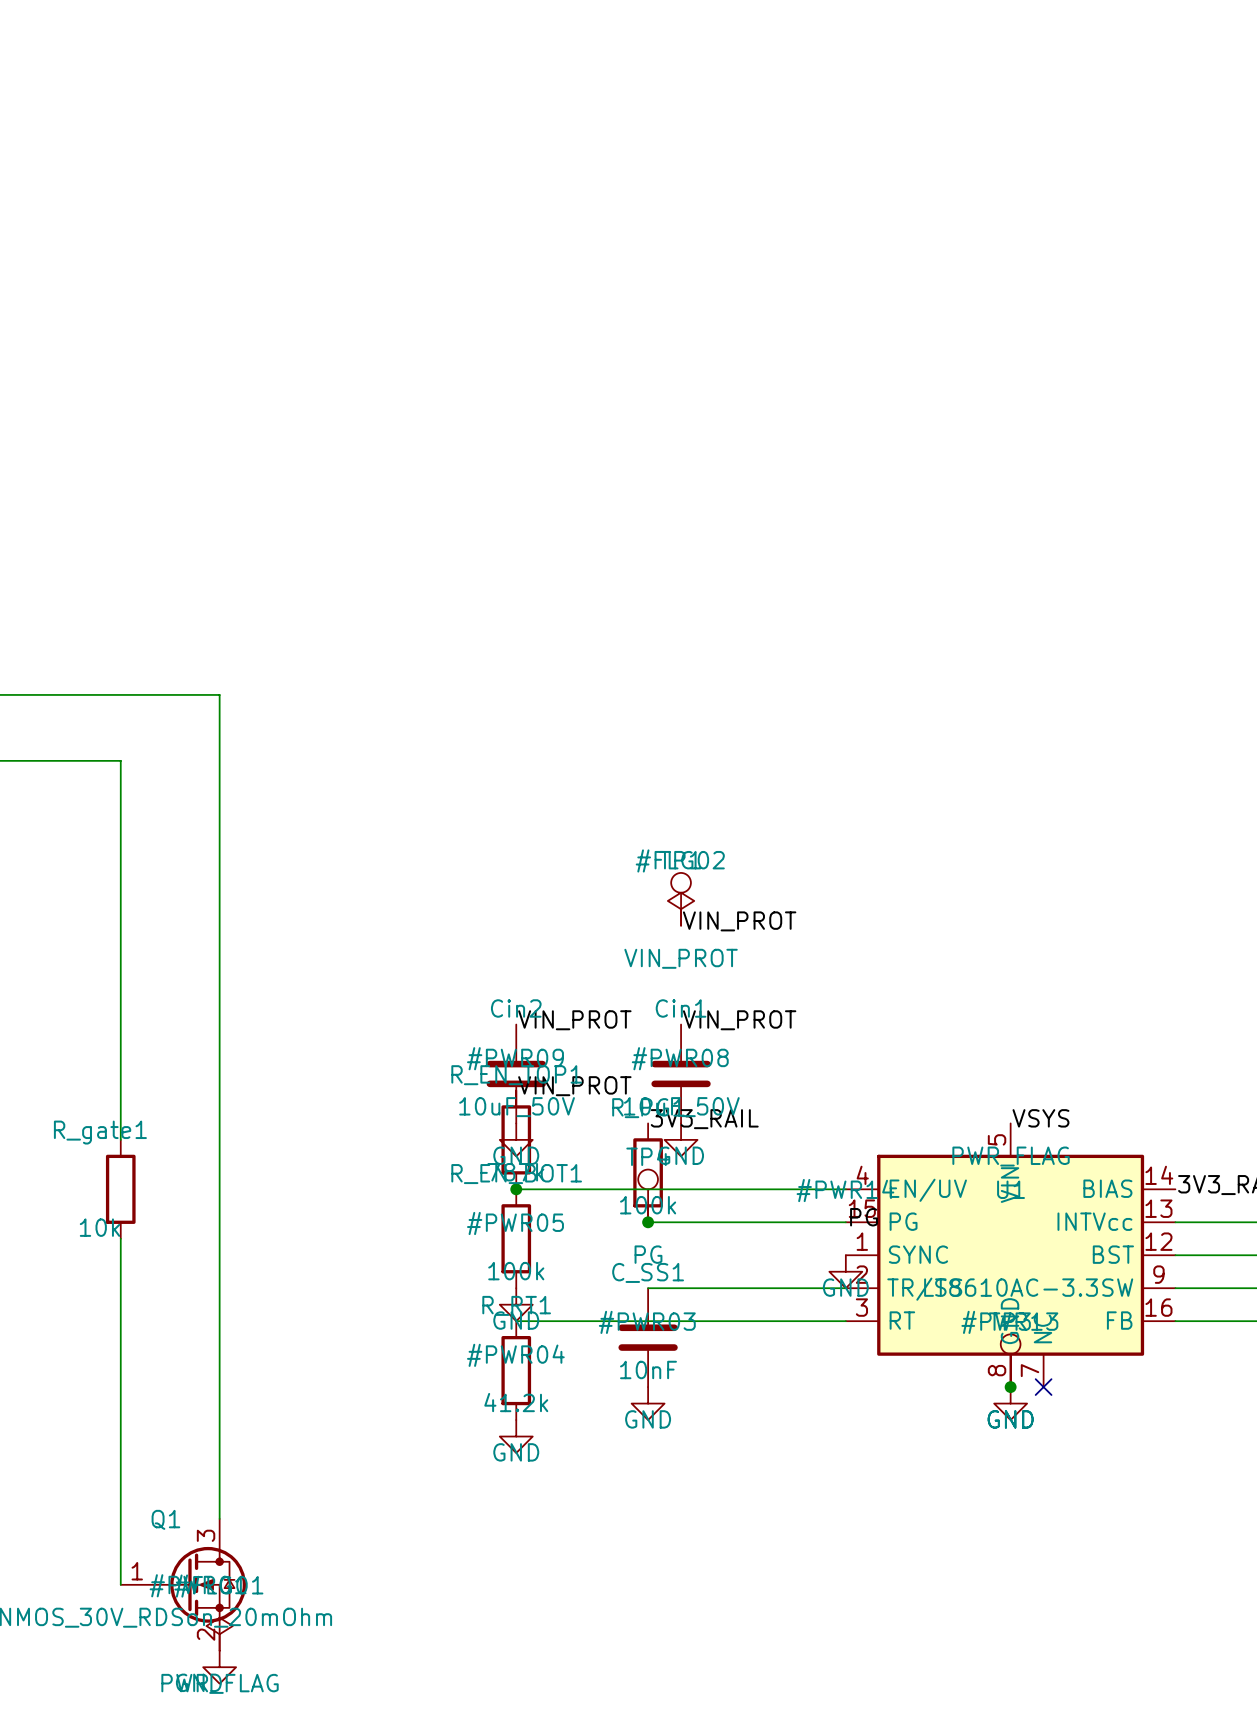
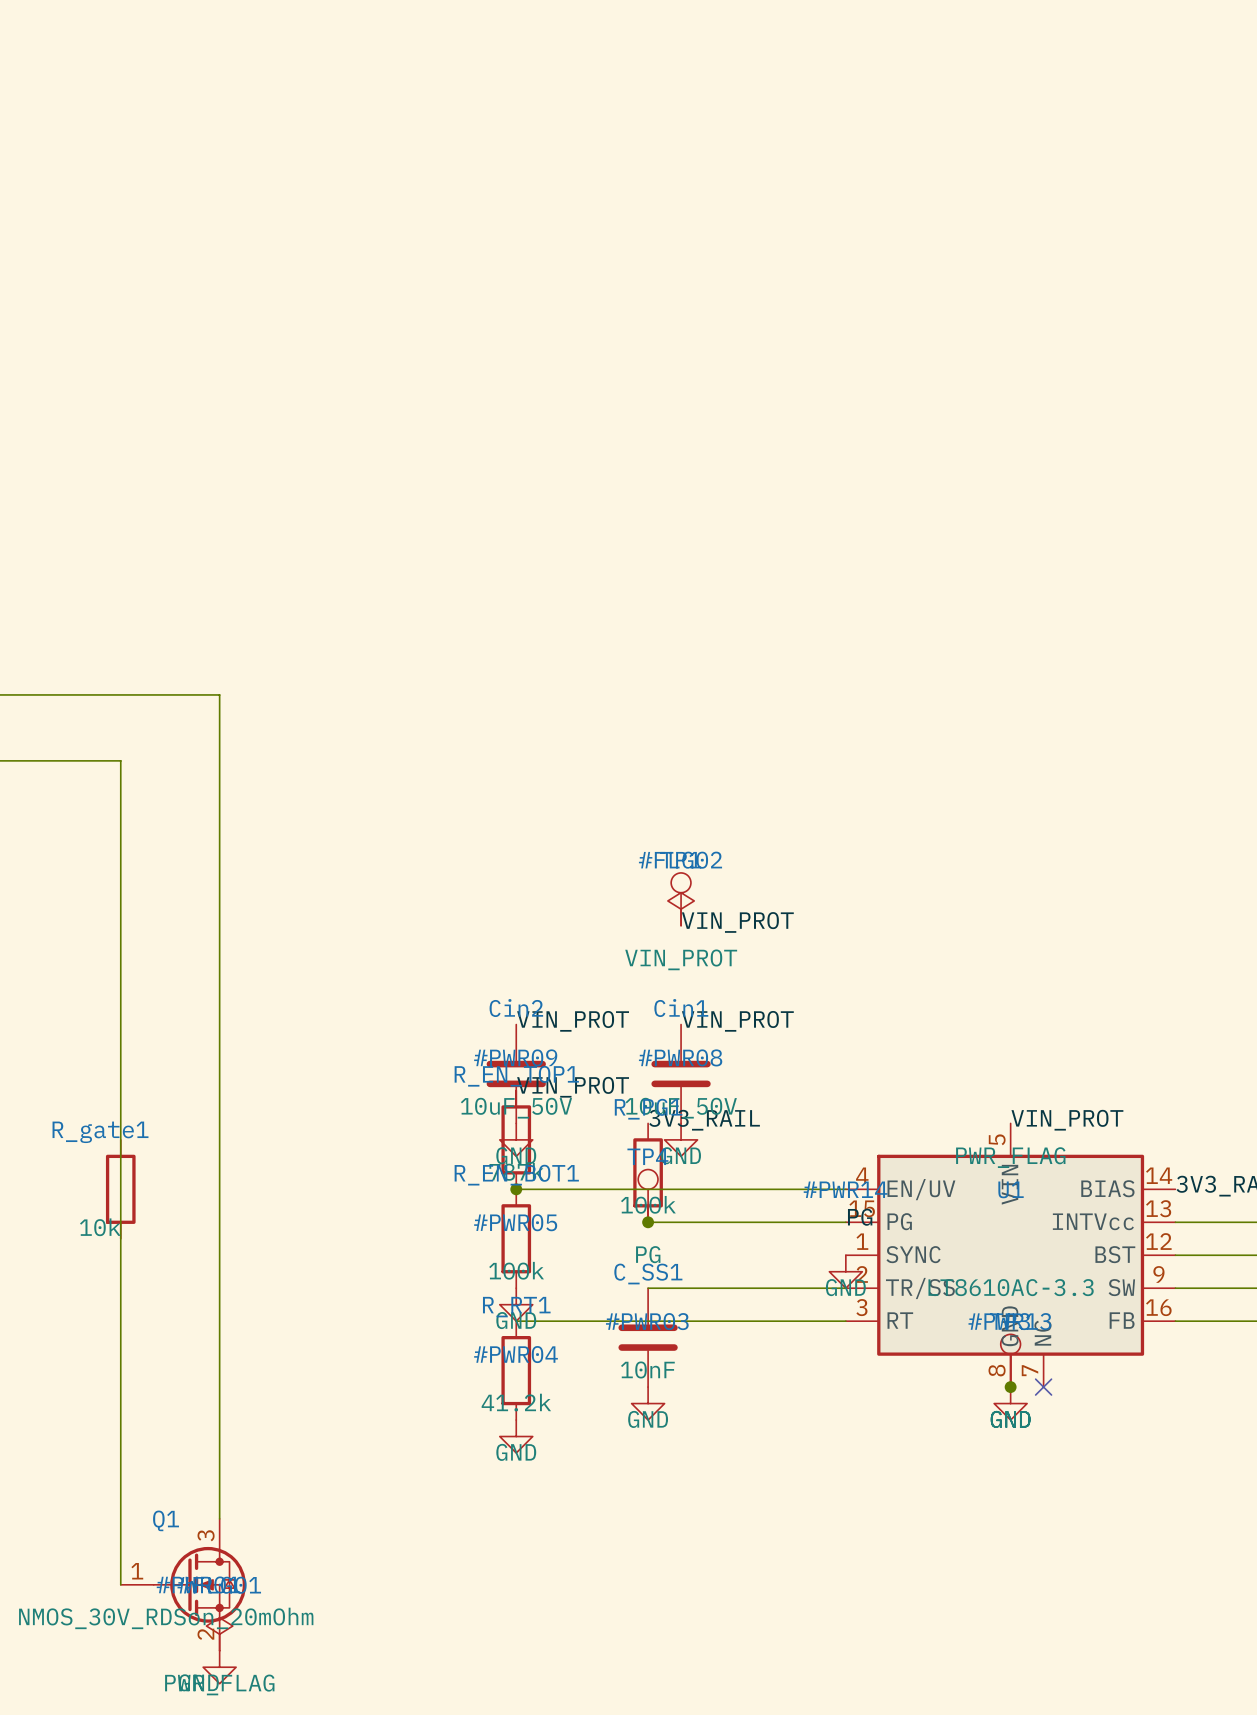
label: VSYS (1040, 1118) -> VIN_PROT (1067, 1120)
wire: none -> (120, 1139) (120, 1238)

